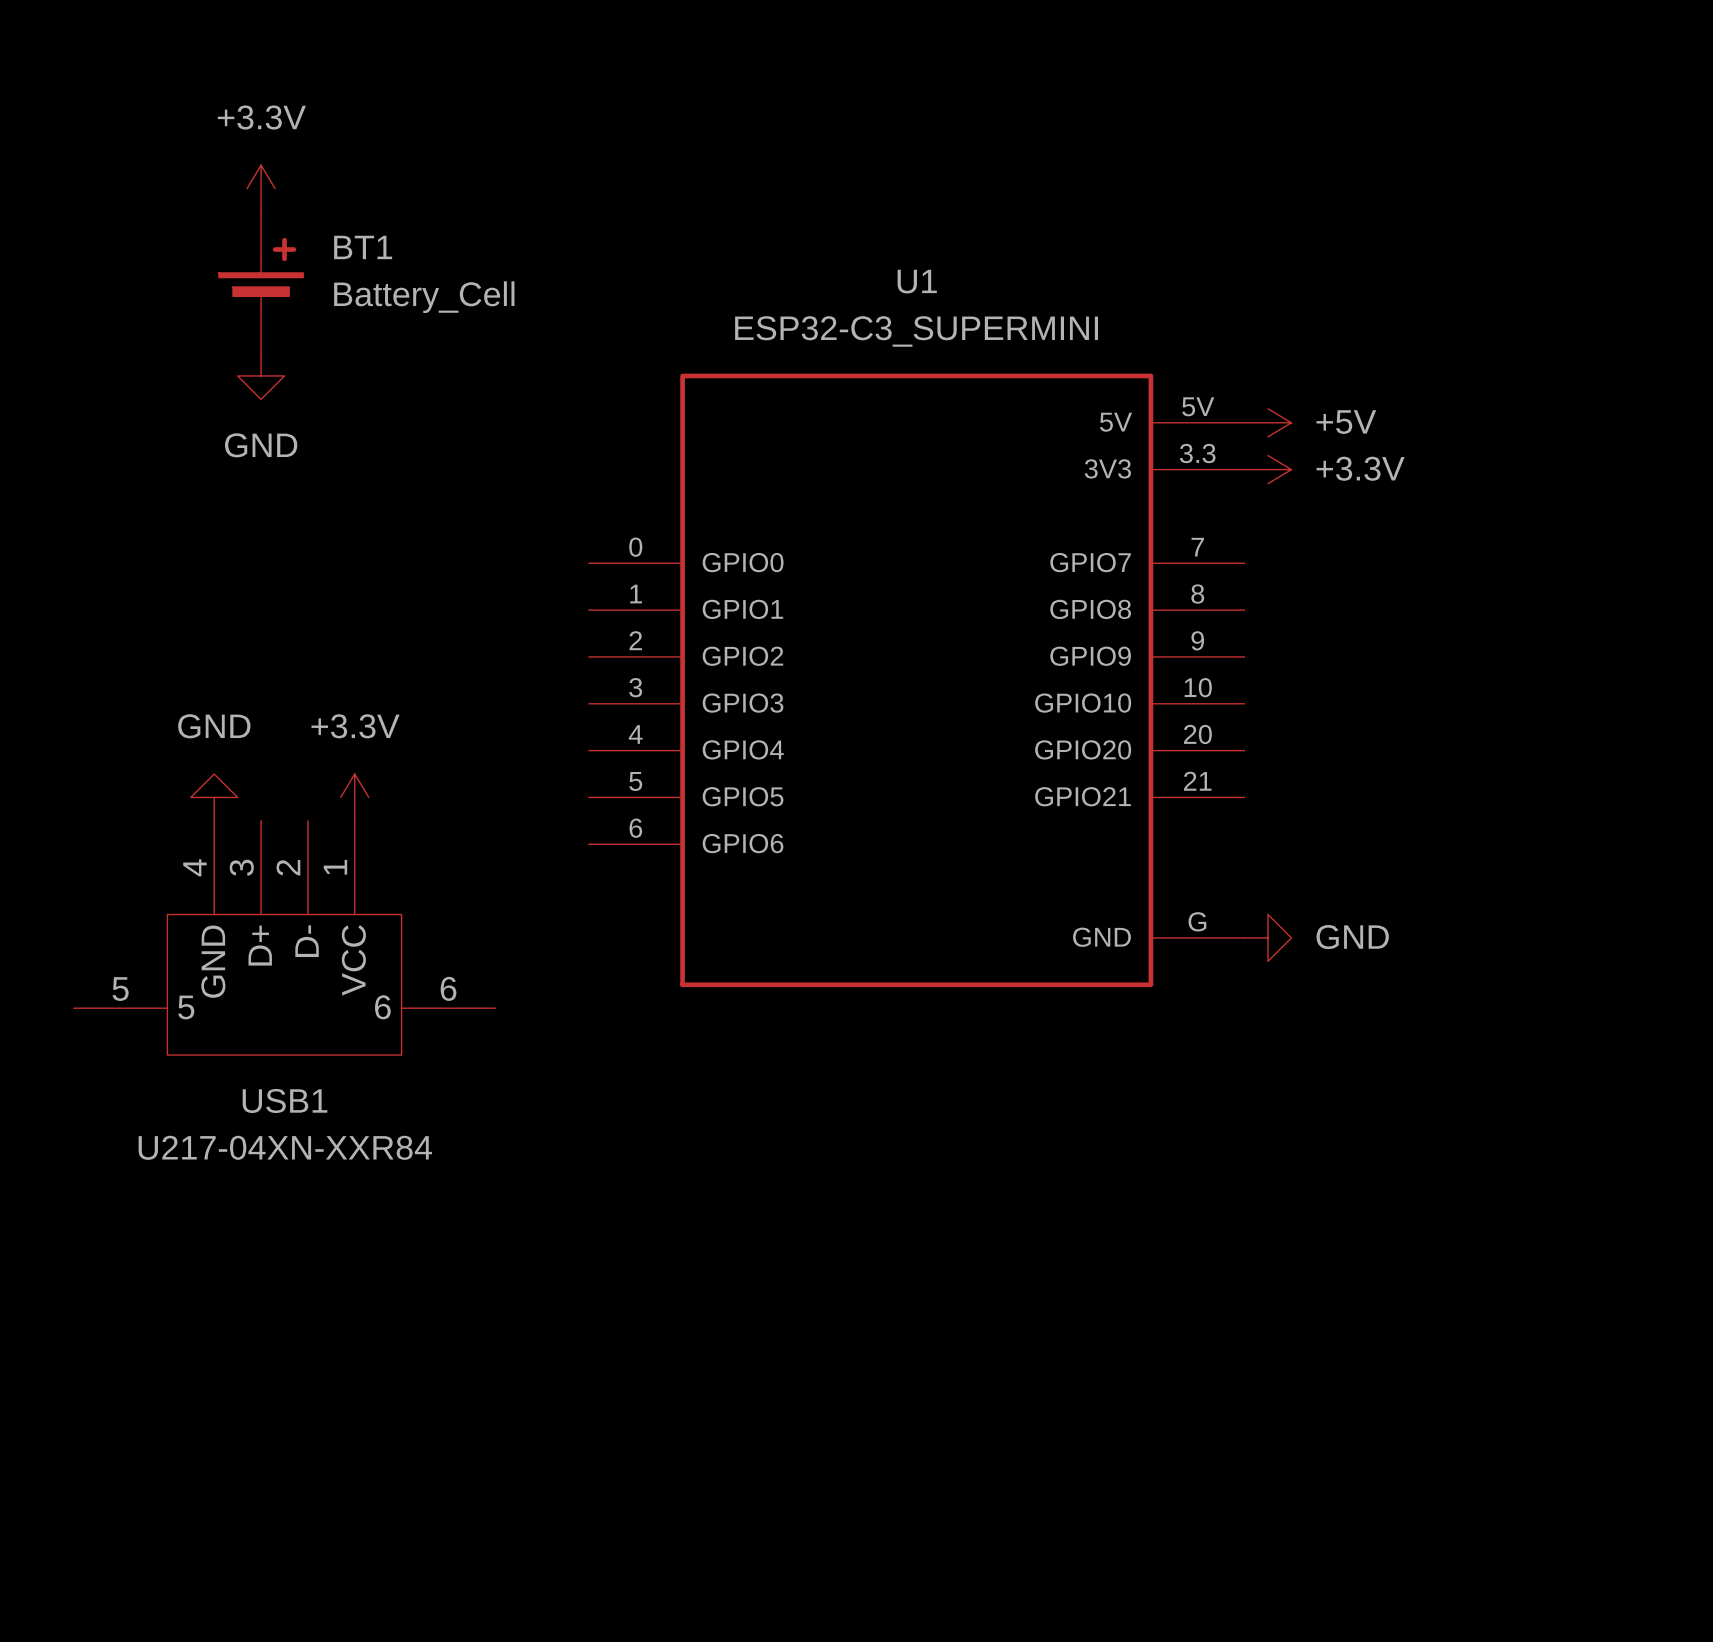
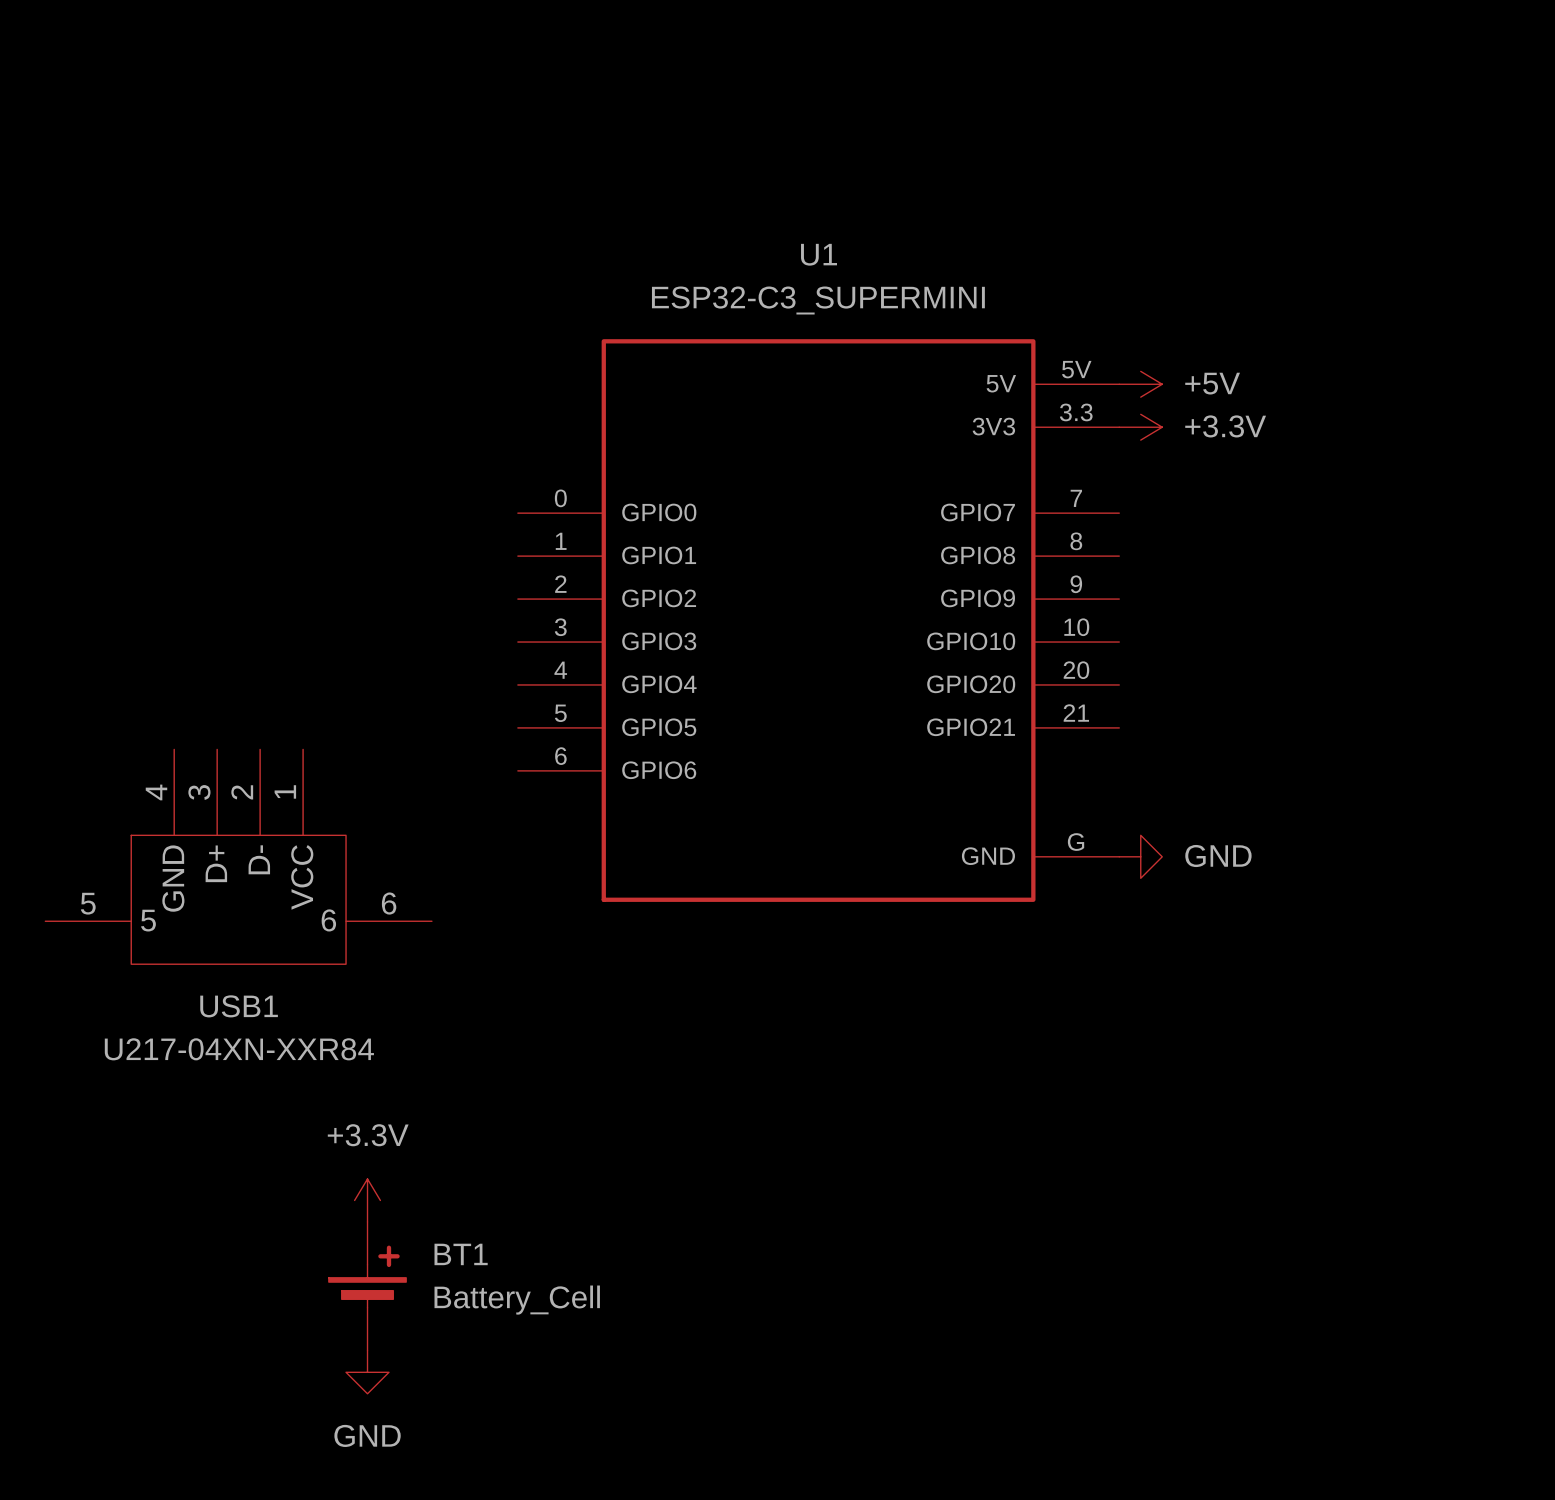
power symbol: +3.3V (261, 188) -> none
BT1 position: (261, 282) -> (367, 1286)
power symbol: GND (261, 375) -> none
power symbol: GND (214, 797) -> none
power symbol: +3.3V (354, 797) -> none
power symbol: none -> +3.3V (367, 1200)
power symbol: none -> GND (367, 1372)

